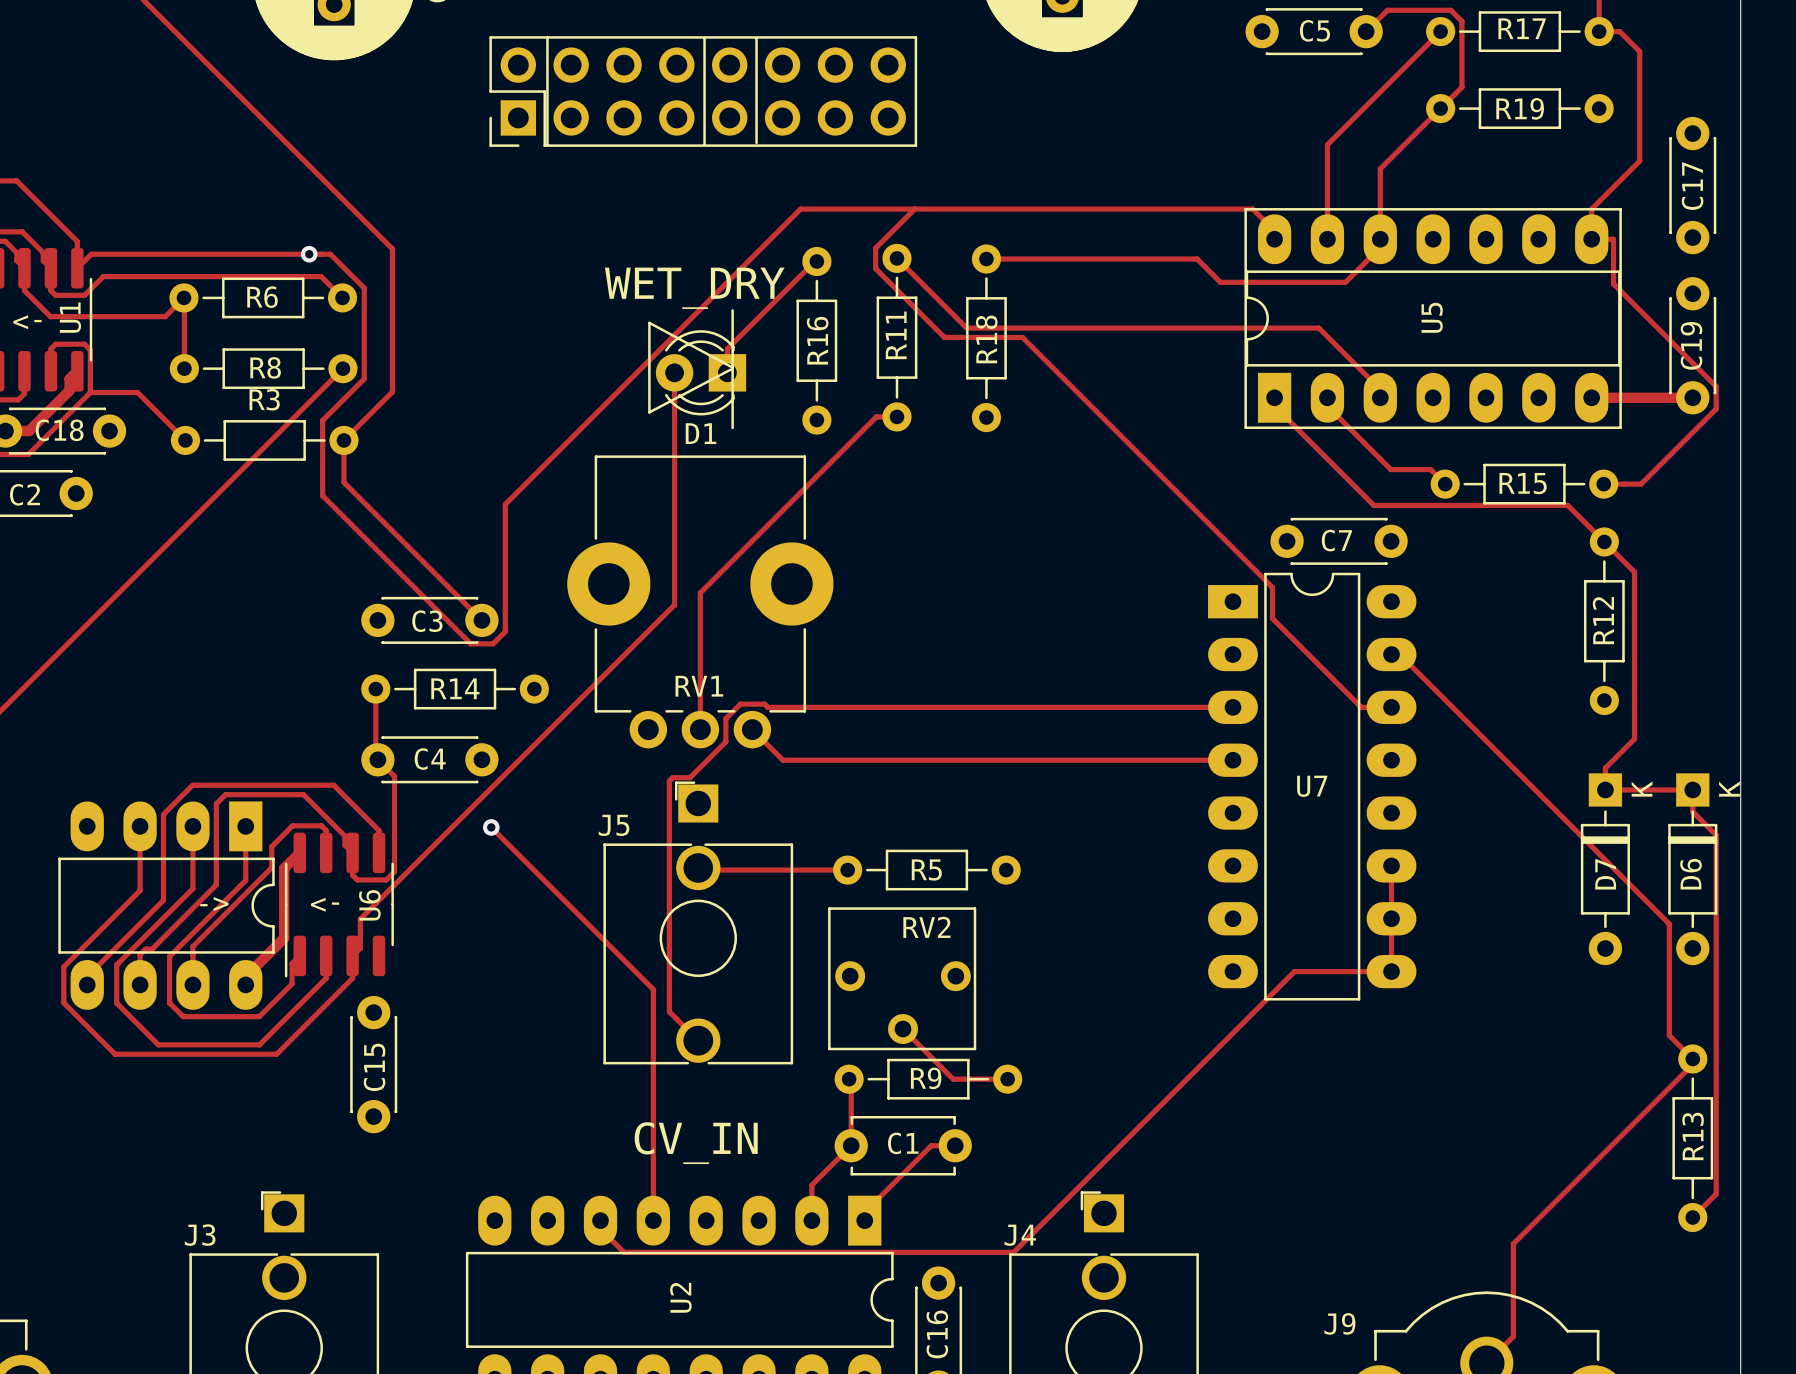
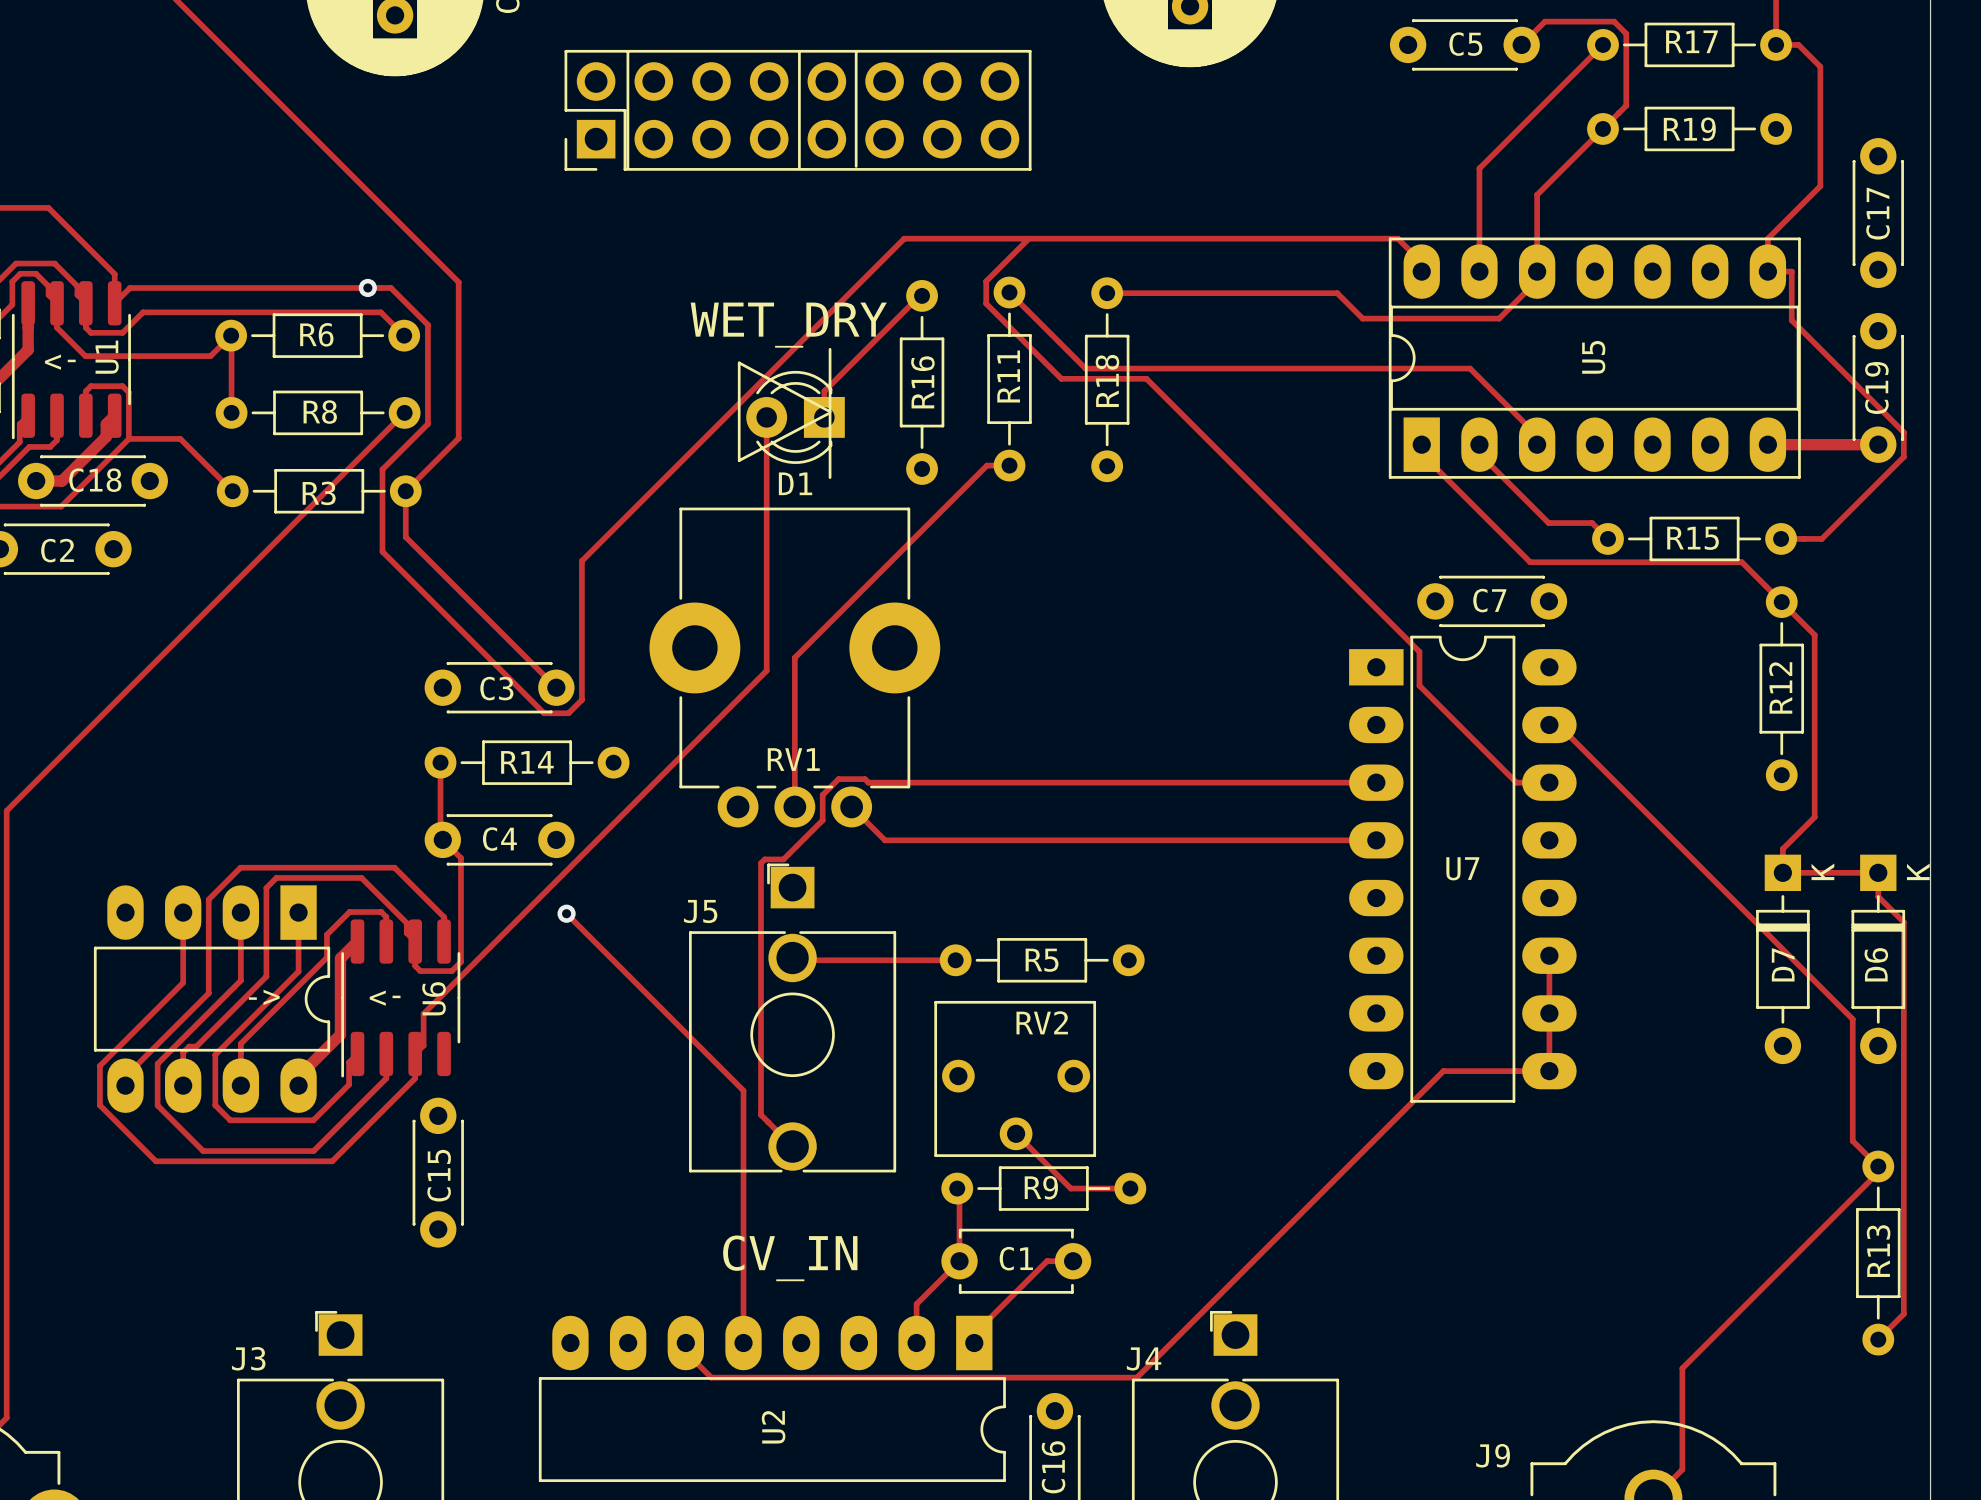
R3 name position: R3 (264, 399) -> R3 (319, 493)

